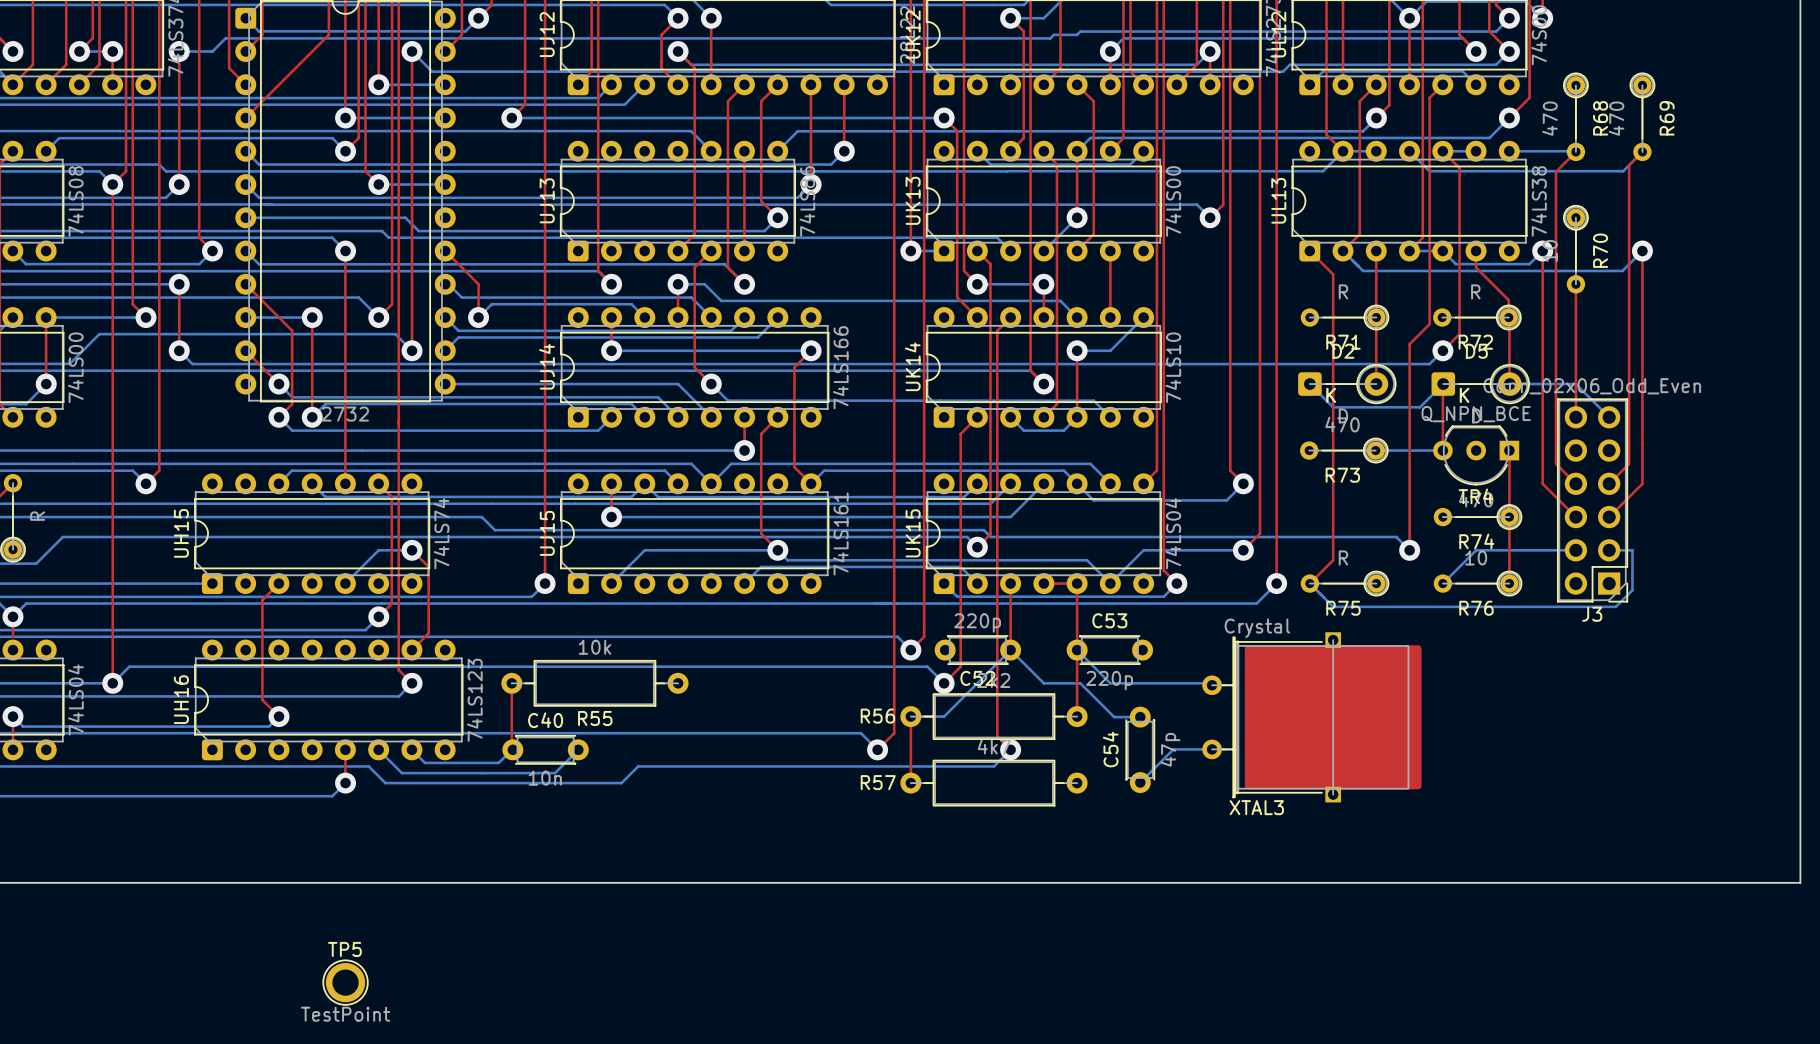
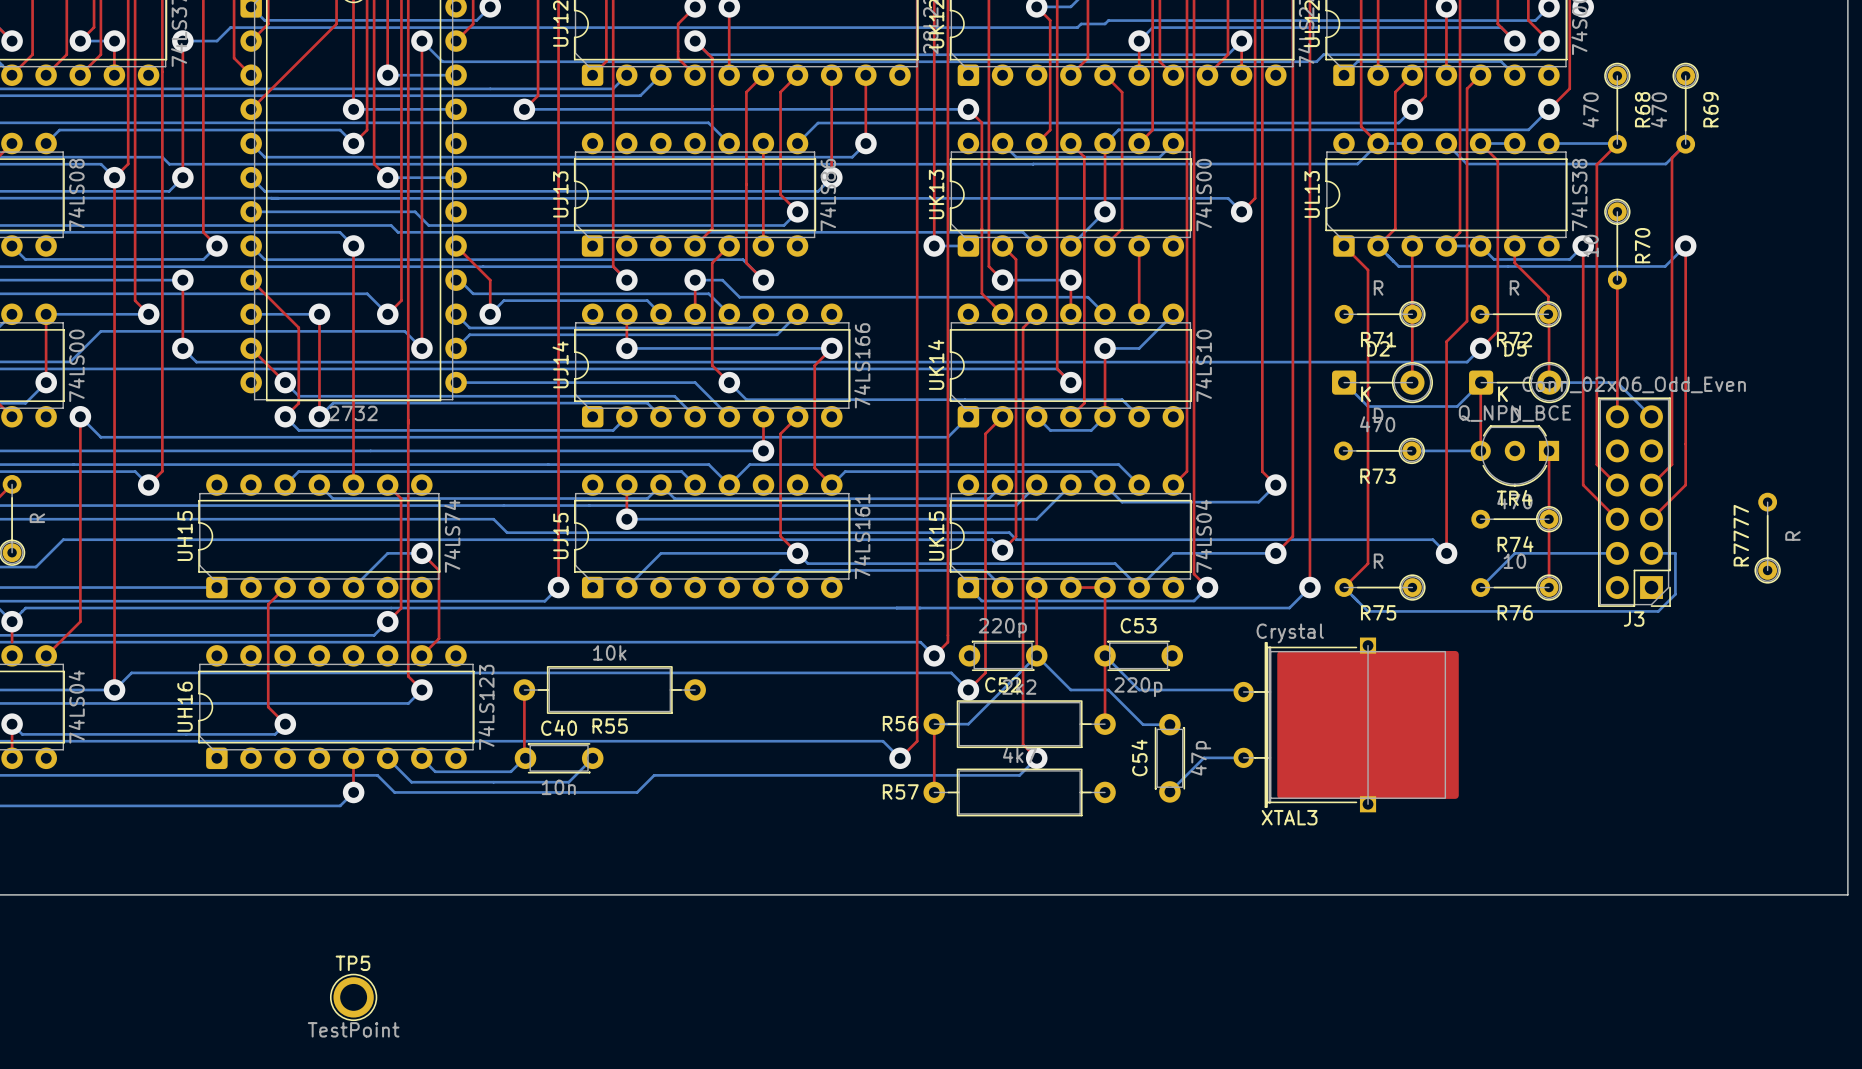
top track: none -> (80, 416) (80, 621) (46, 655)
bottom track: none -> (80, 416) (100, 437) (947, 437) (968, 416)
via: none -> (80, 416)
R7777: none -> R (1767, 538)

